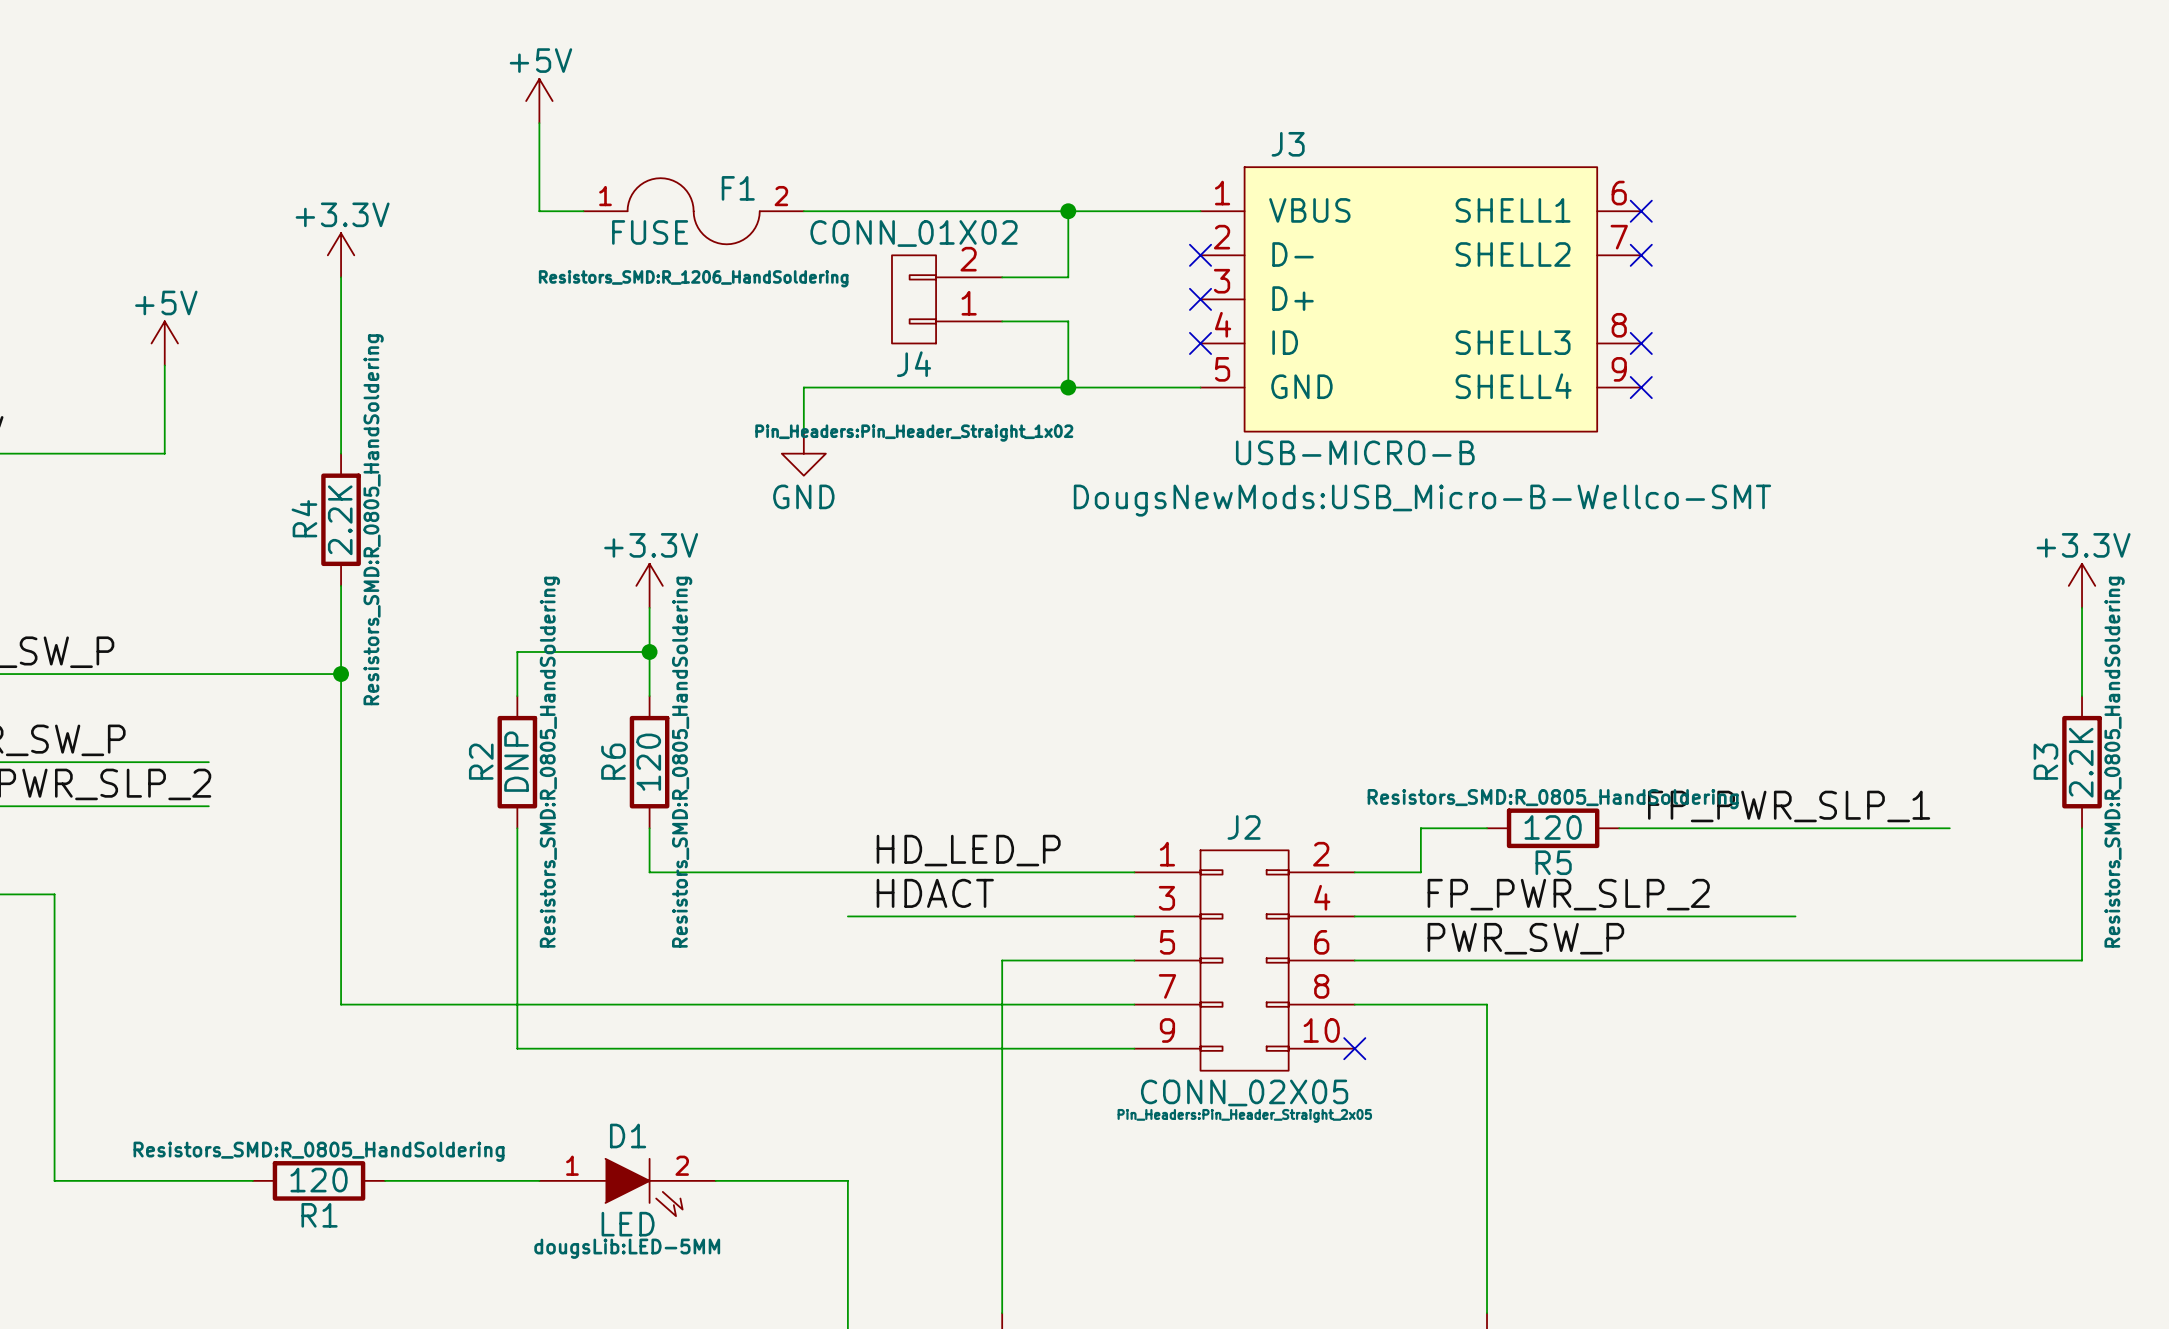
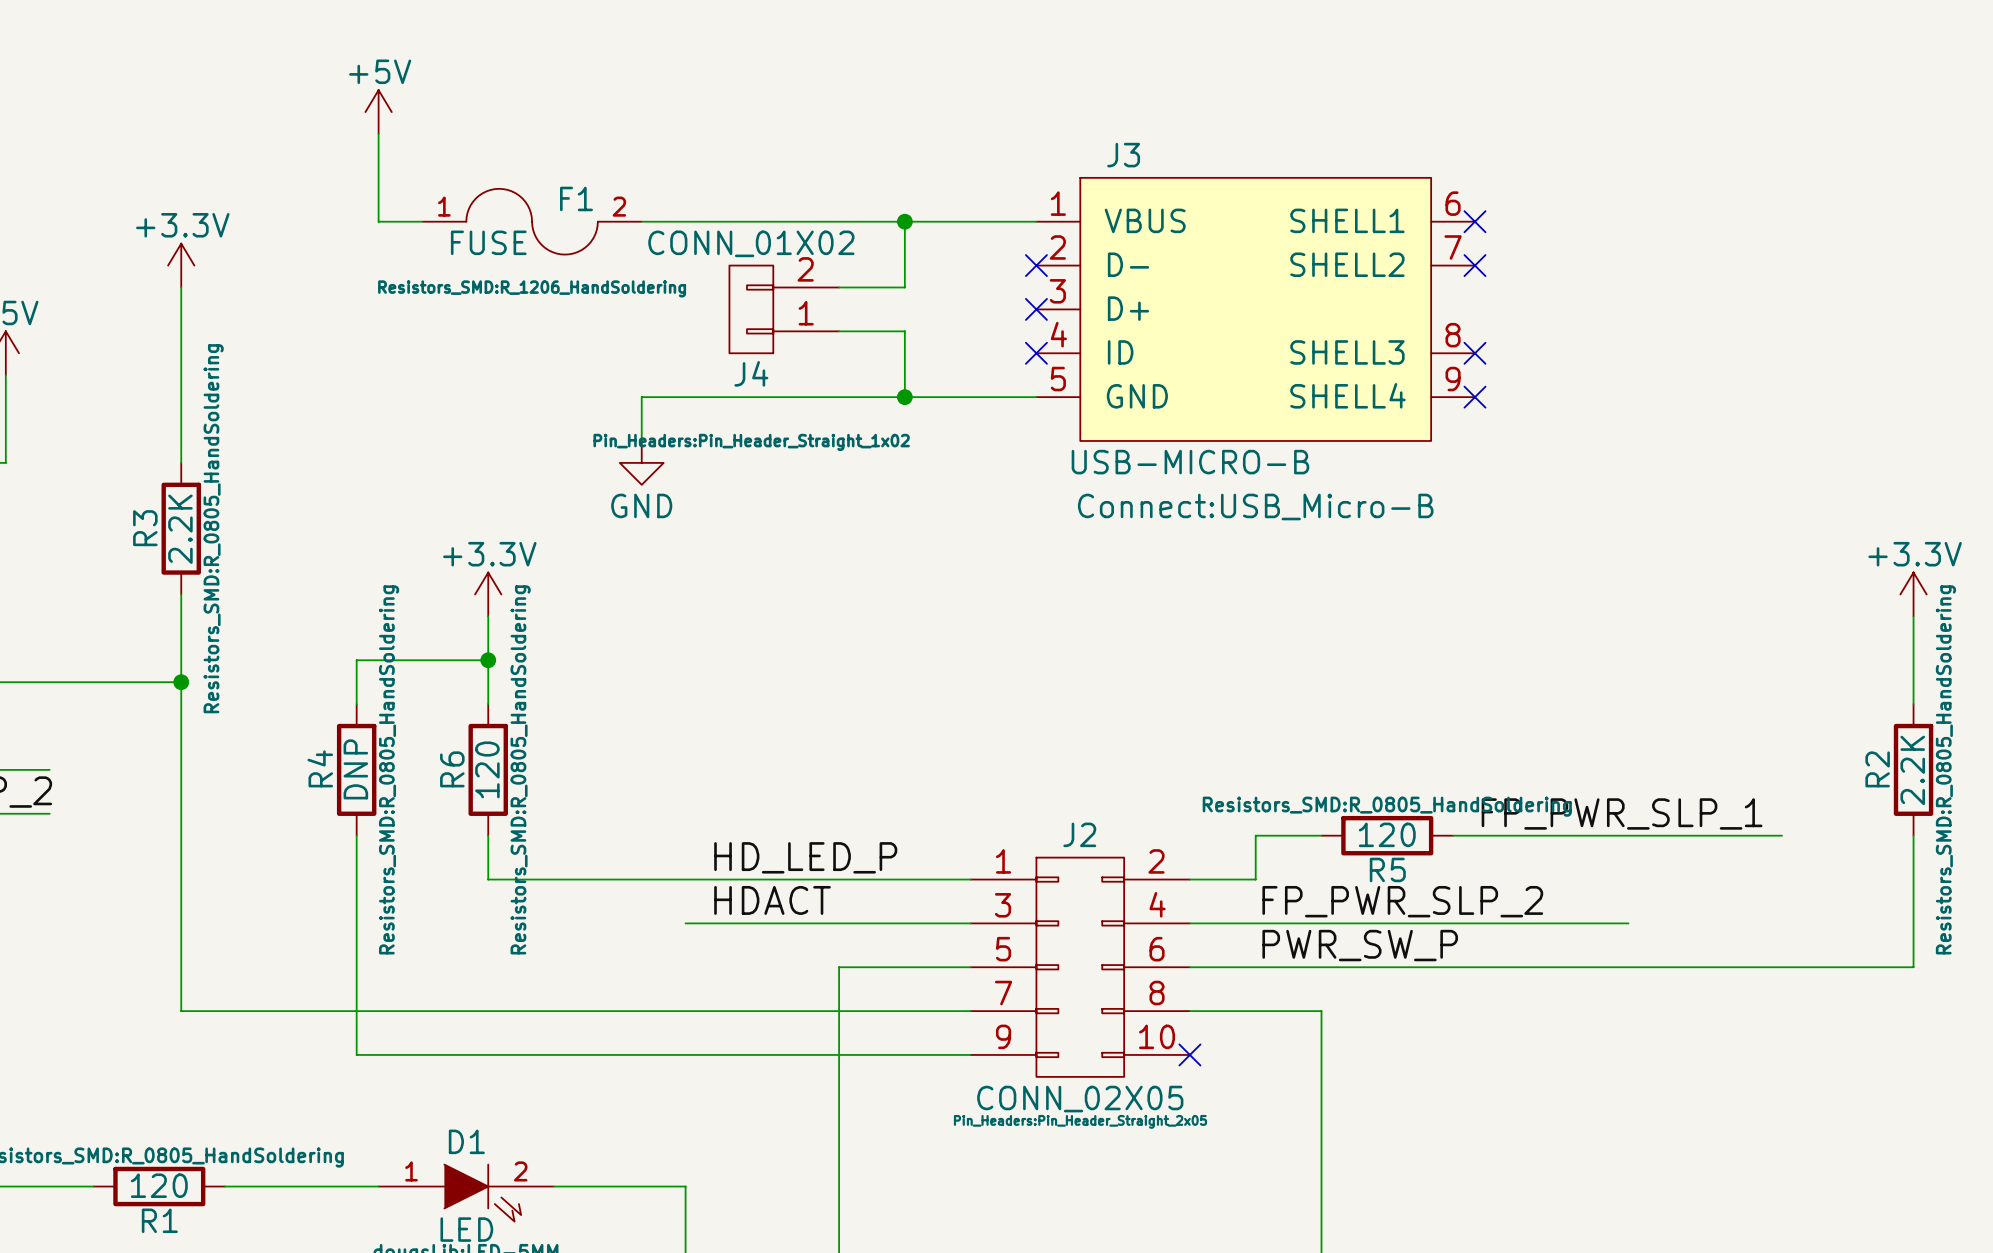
J3 text: DougsNewMods:USB_Micro-B-Wellco-SMT (1422, 500) -> Connect:USB_Micro-B (1255, 506)
R4 name: R4 (304, 518) -> R3 (145, 528)
R2 name: R2 (481, 761) -> R4 (320, 768)
R3 name: R3 (2045, 761) -> R2 (1877, 769)

